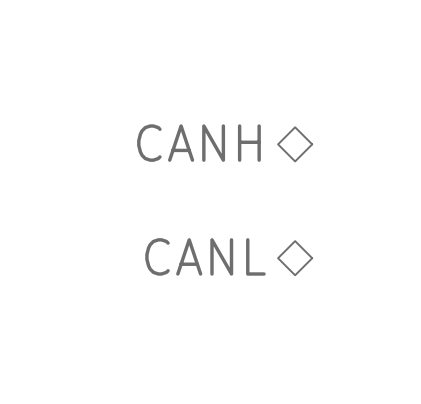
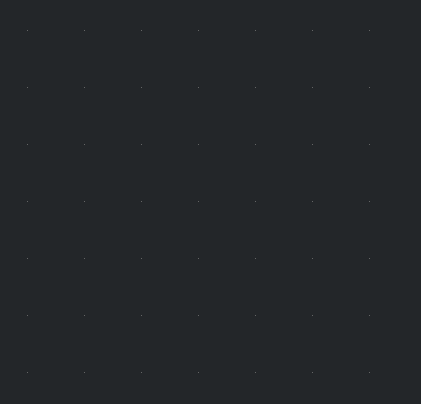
hierarchical label: CANH (198, 143) -> none
hierarchical label: CANL (205, 256) -> none

